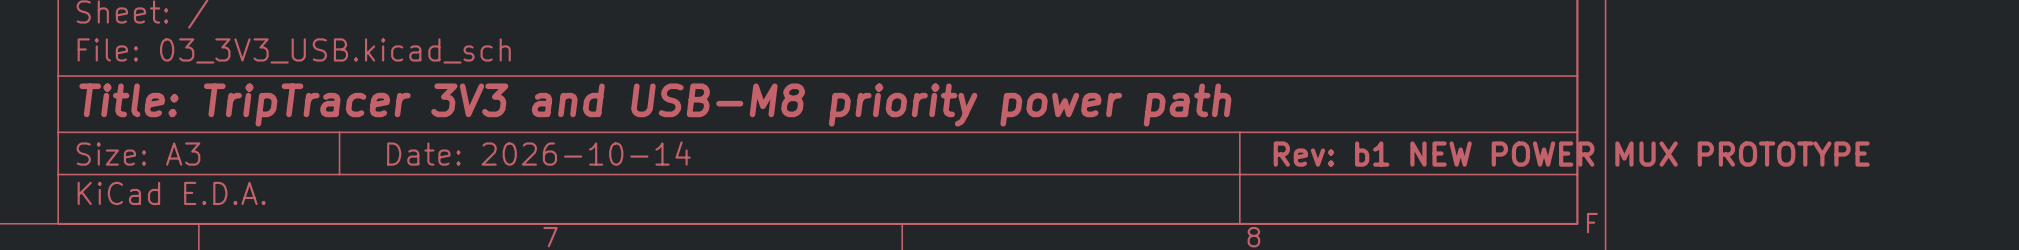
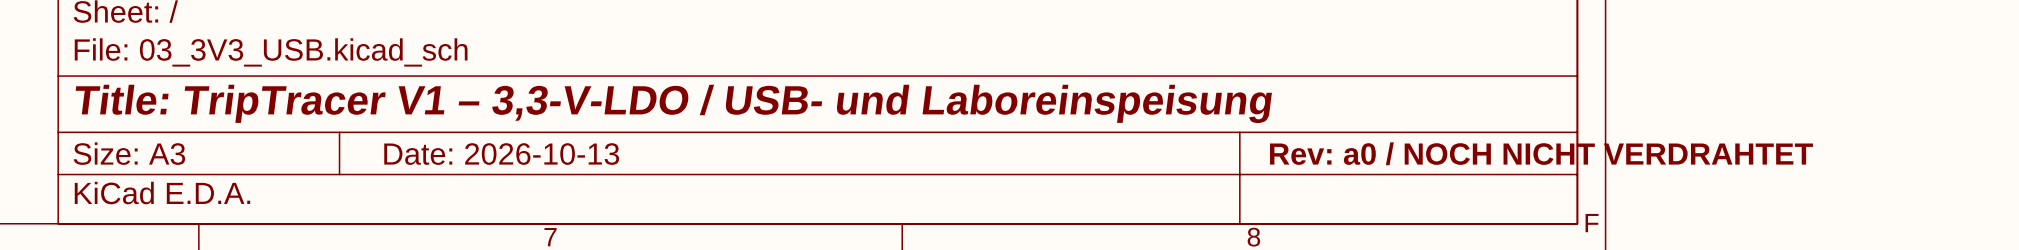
title block: Title: TripTracer 3V3 and USB-M8 priority power path (655, 105) -> Title: TripTracer V1 – 3,3-V-LDO / USB- und Laboreinspeisung (673, 103)
title block: Date: 2026-10-14 (538, 153) -> Date: 2026-10-13 (501, 154)
title block: Rev: b1 NEW POWER MUX PROTOTYPE (1571, 154) -> Rev: a0 / NOCH NICHT VERDRAHTET (1541, 153)

